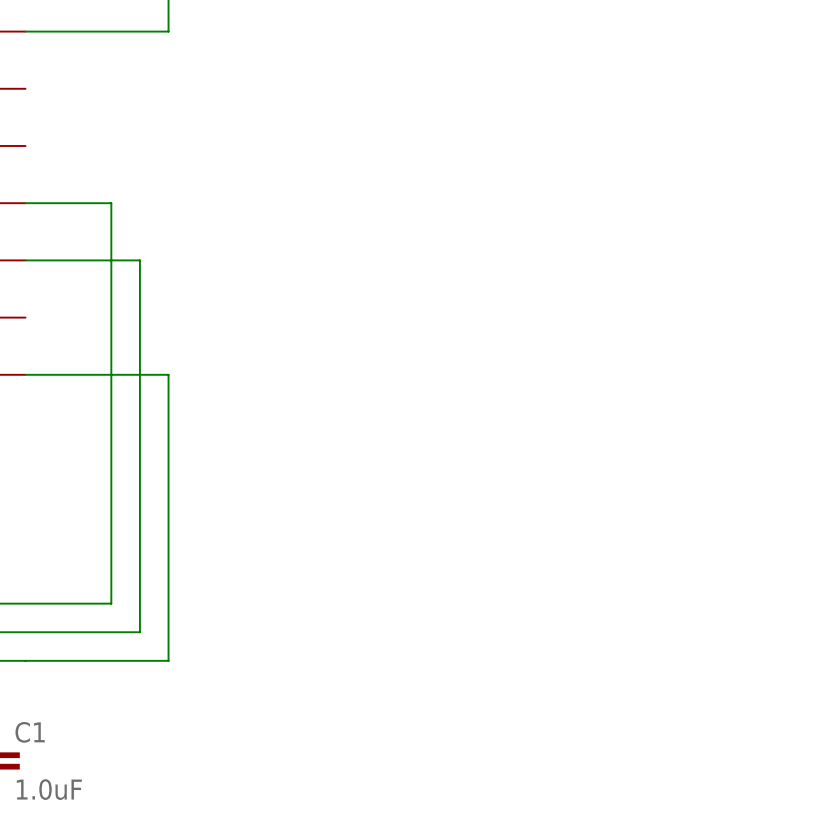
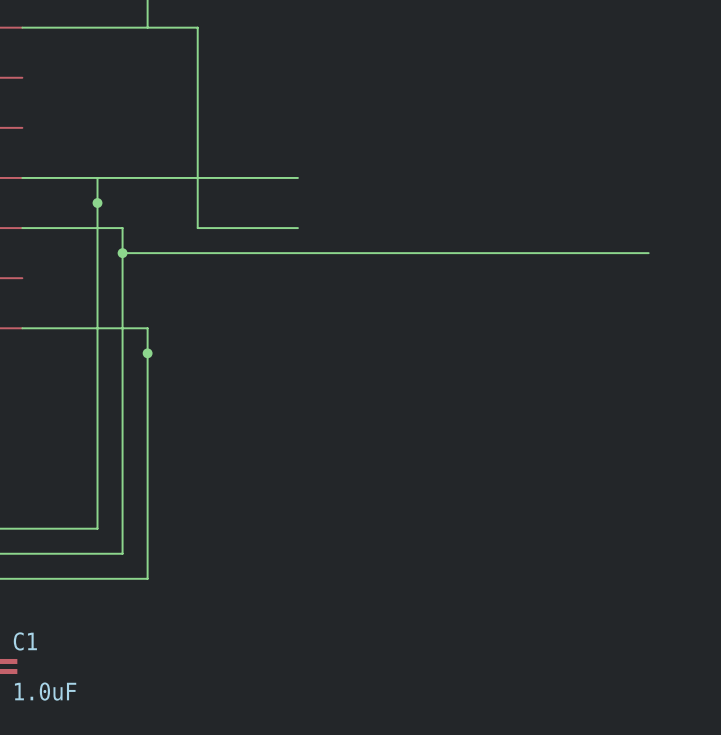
wire: none -> (147, 27) (197, 27) (197, 228) (297, 228)
wire: none -> (97, 177) (297, 177)
junction: none -> (97, 203)
wire: none -> (122, 253) (648, 253)
junction: none -> (122, 253)
junction: none -> (147, 353)

